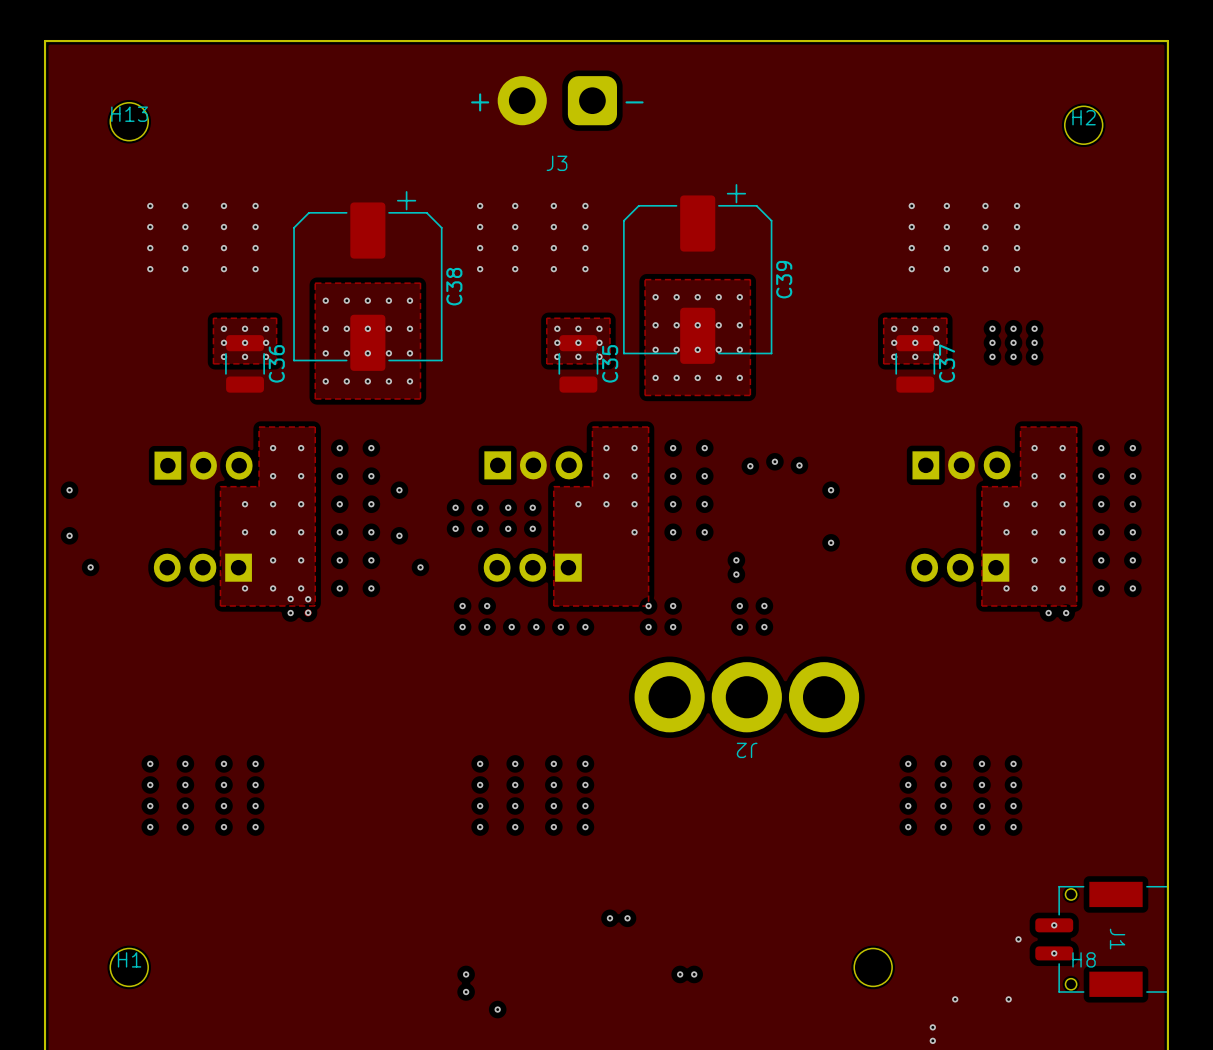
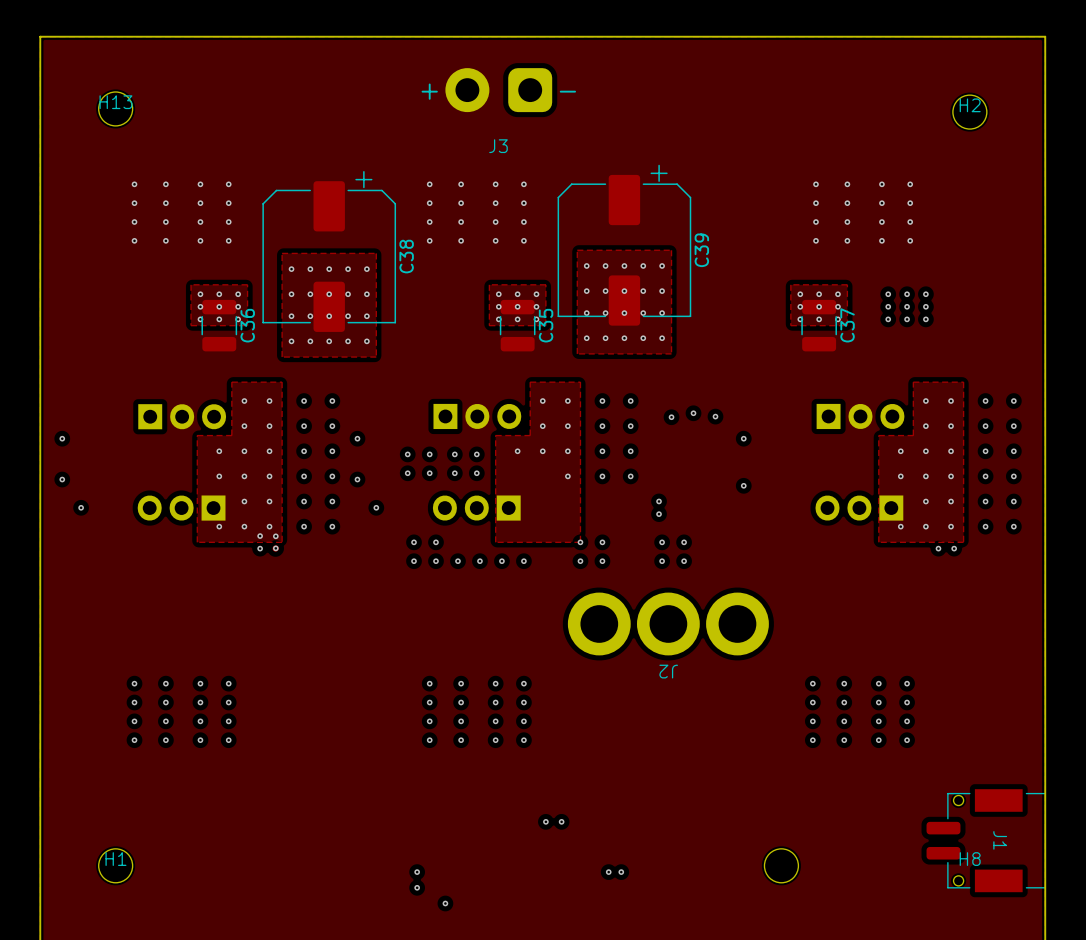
via: (1054, 925) -> none
via: (1018, 939) -> none
via: (1054, 953) -> none
via: (955, 999) -> none
via: (1008, 999) -> none
via: (932, 1027) -> none
via: (932, 1040) -> none

